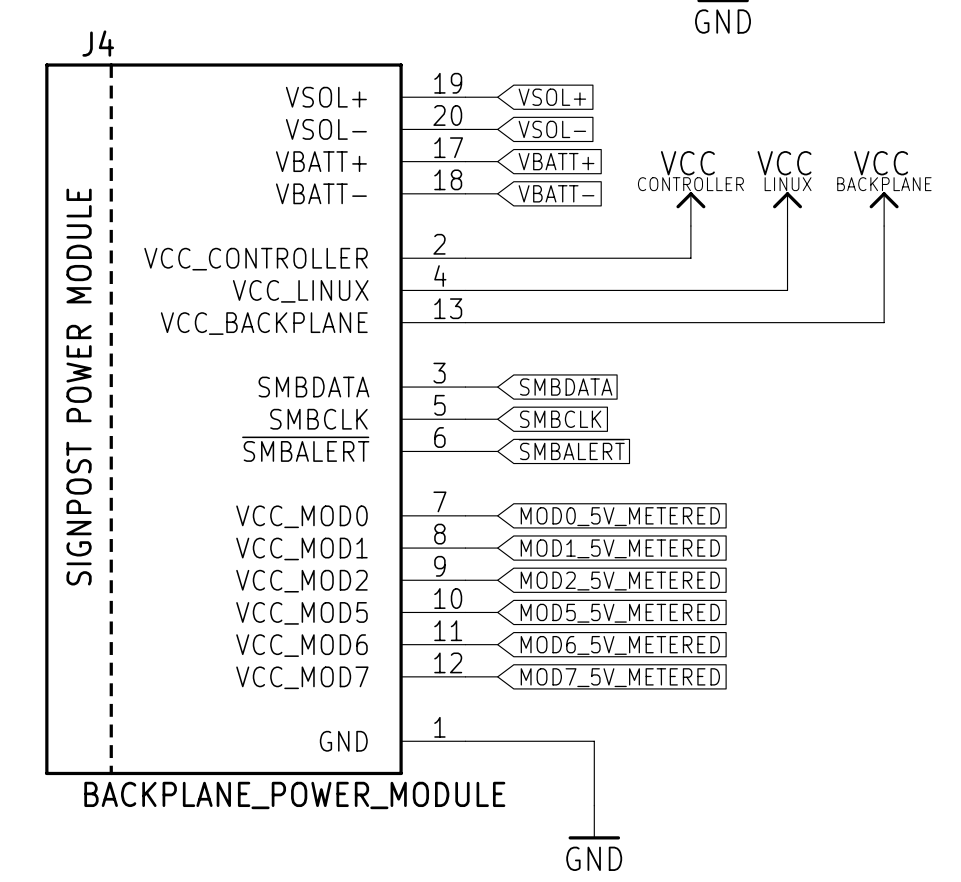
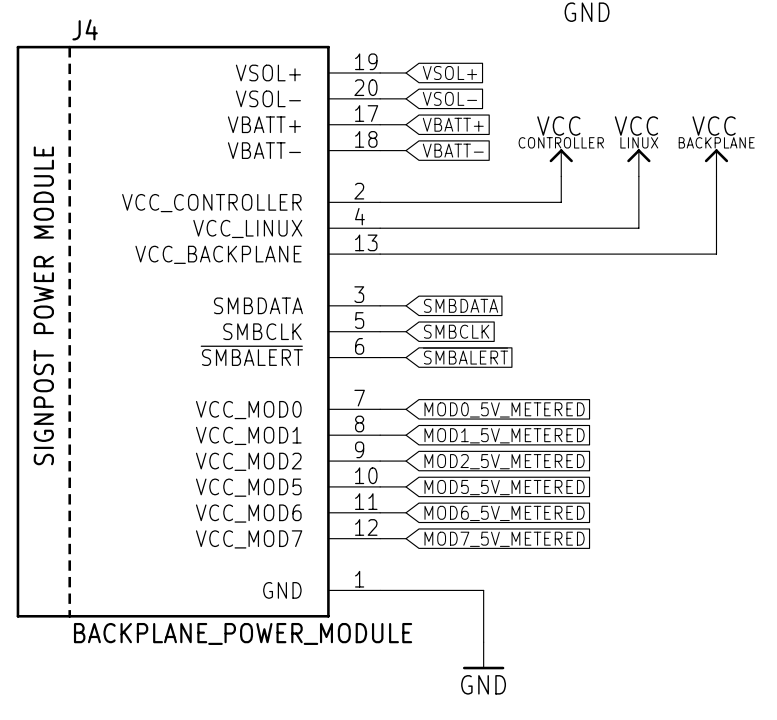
J4 symbol: [45, 63, 466, 776] -> [16, 45, 381, 618]

